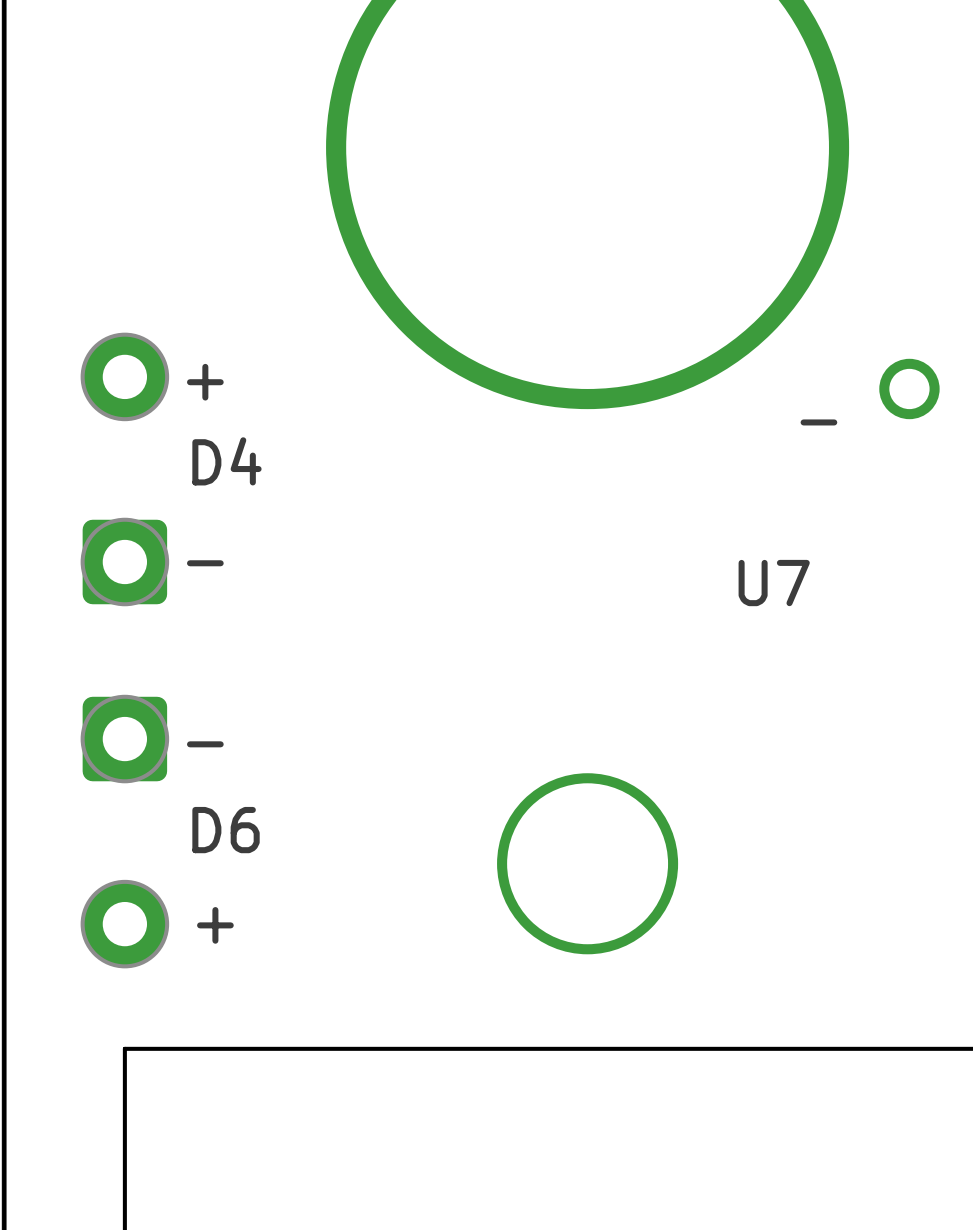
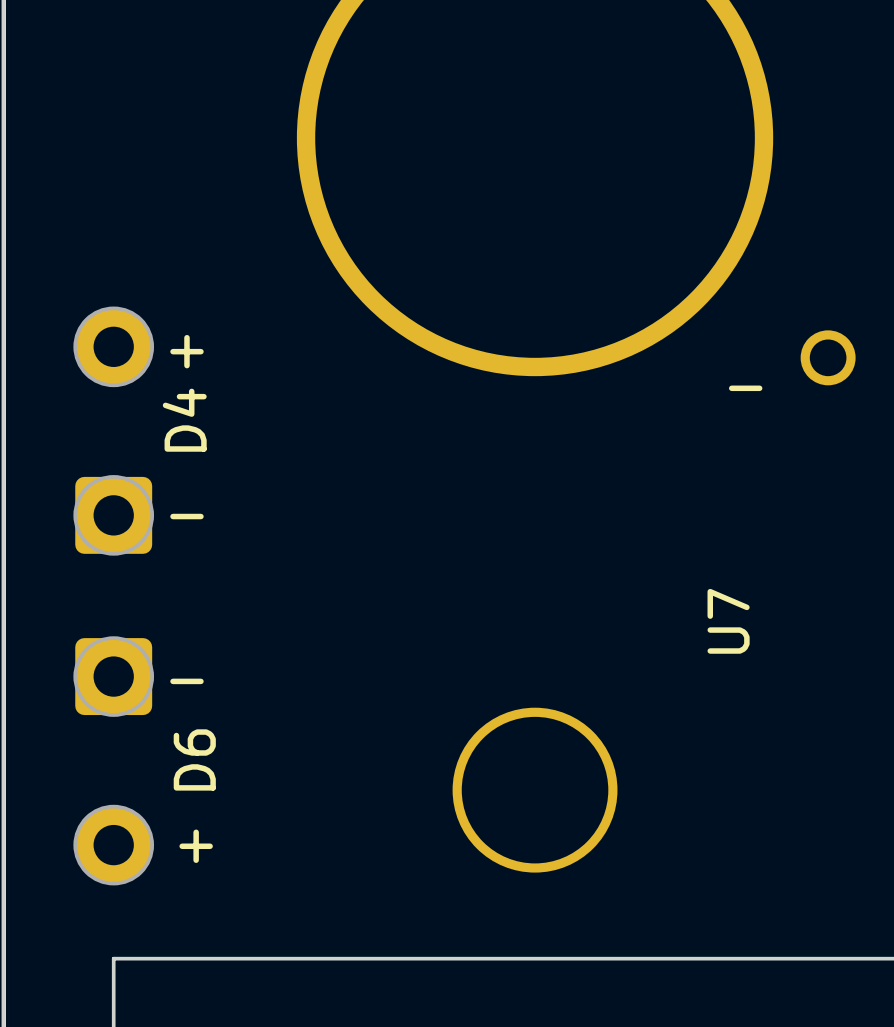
D4 name rotation: 0° (226, 461) -> 90° counterclockwise (184, 420)
U7 name rotation: 0° (774, 583) -> 90° counterclockwise (728, 621)
D6 name rotation: 0° (226, 830) -> 90° counterclockwise (194, 759)

